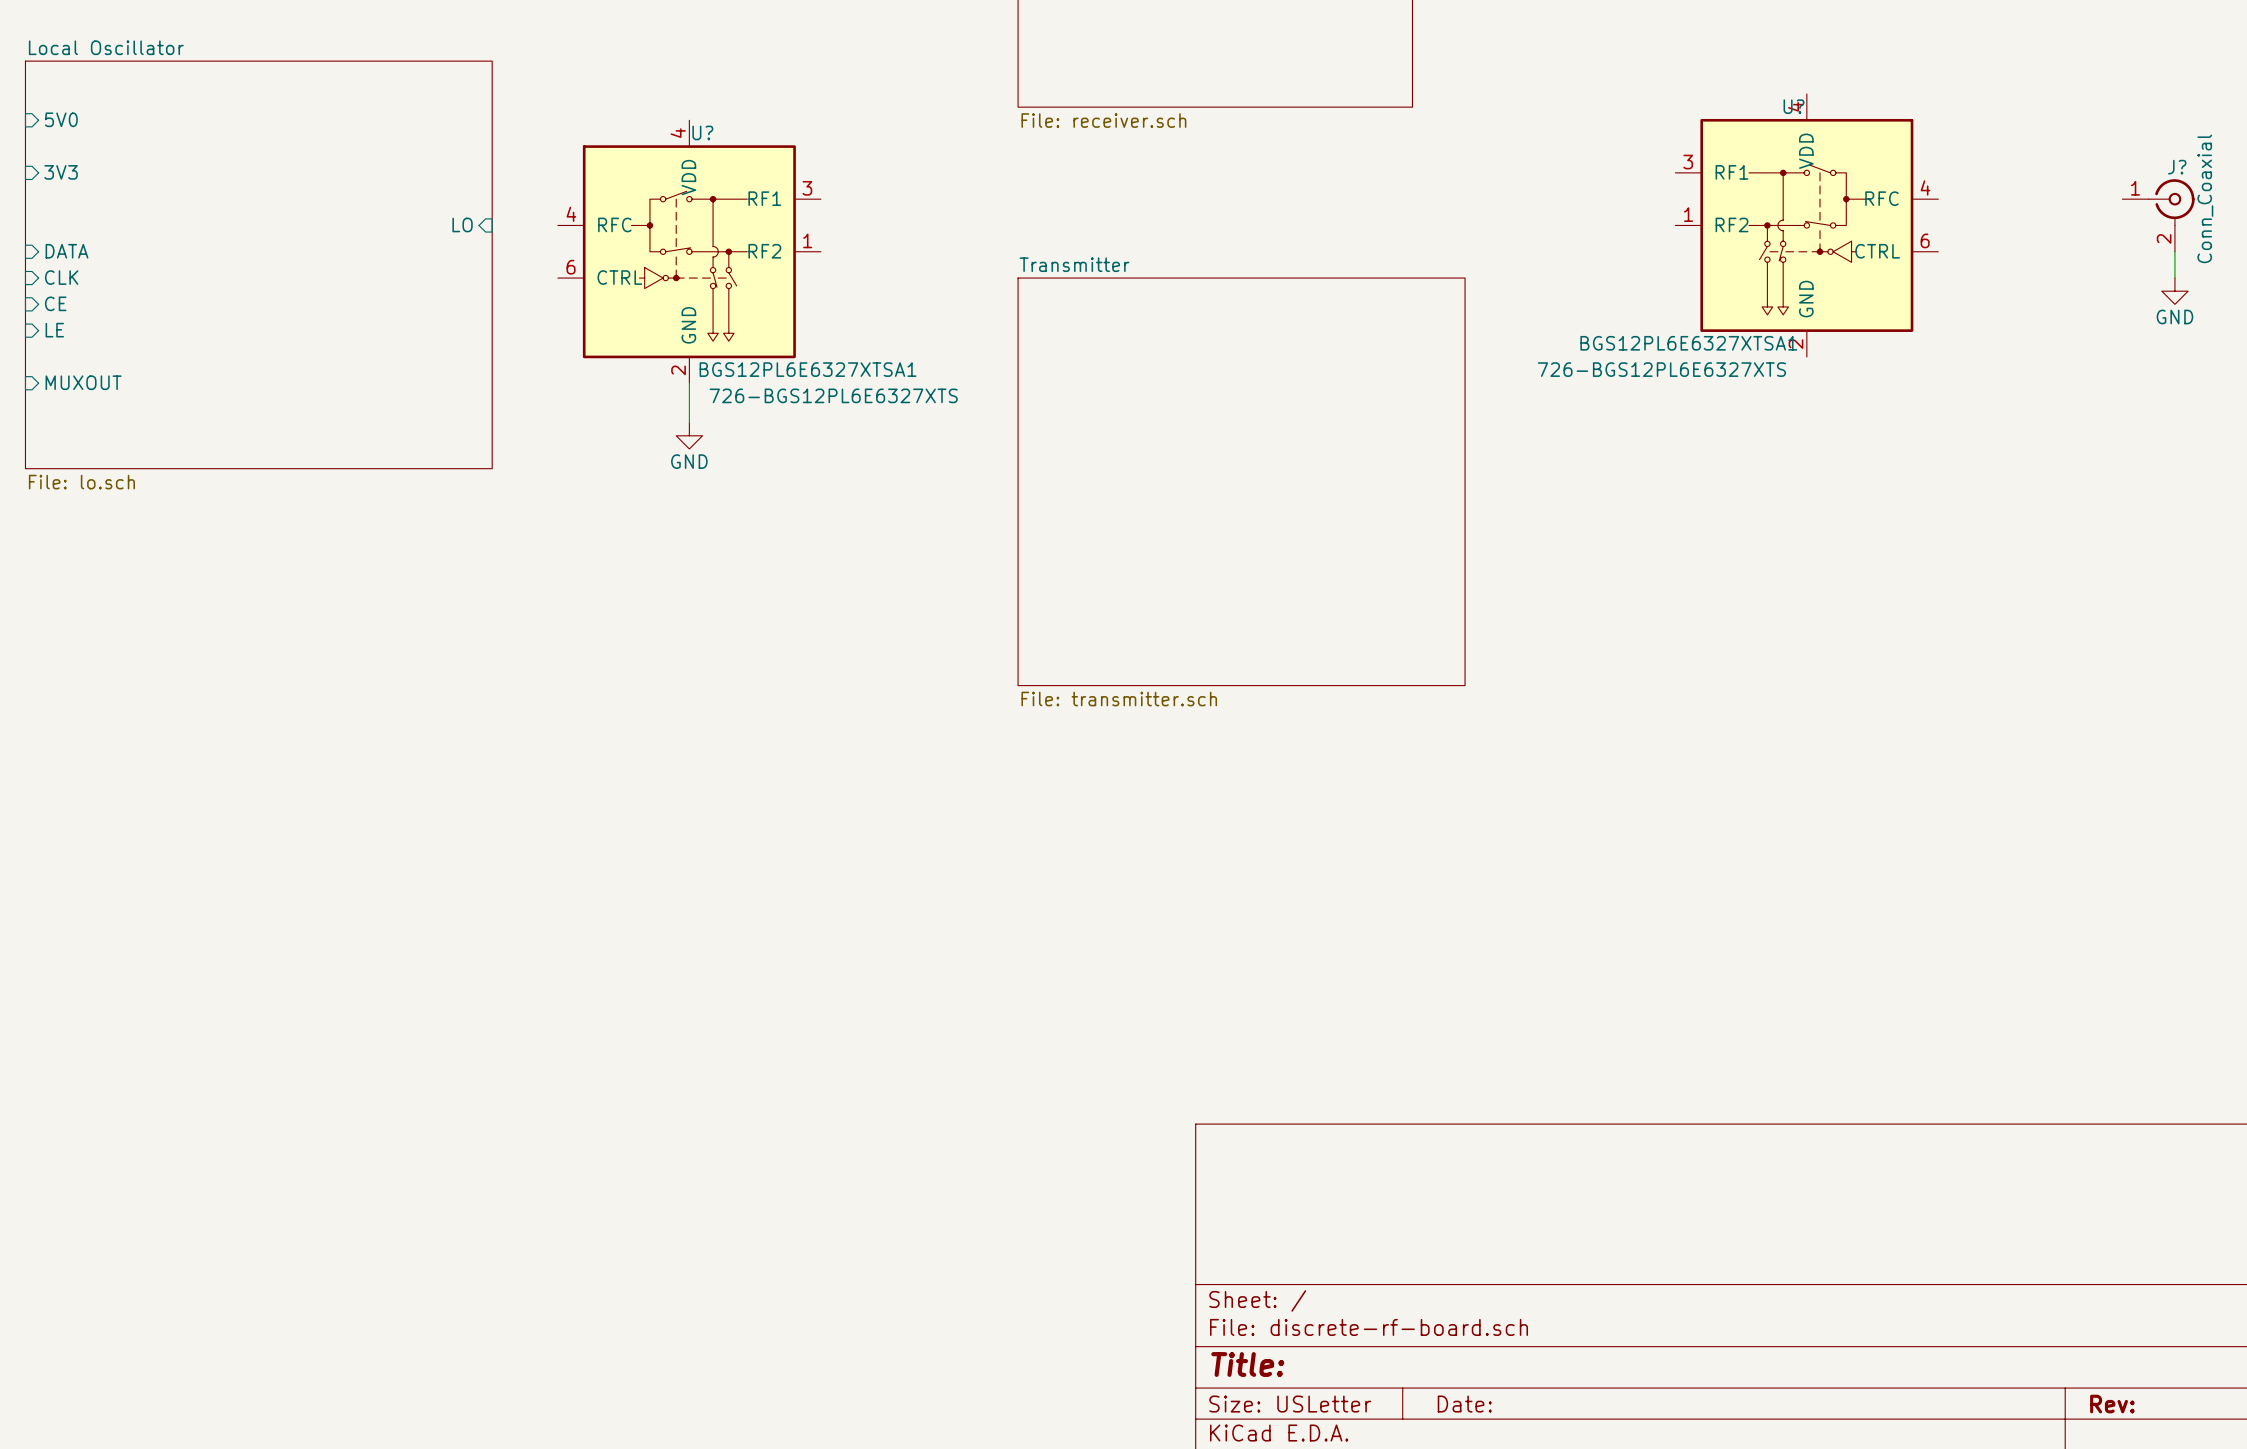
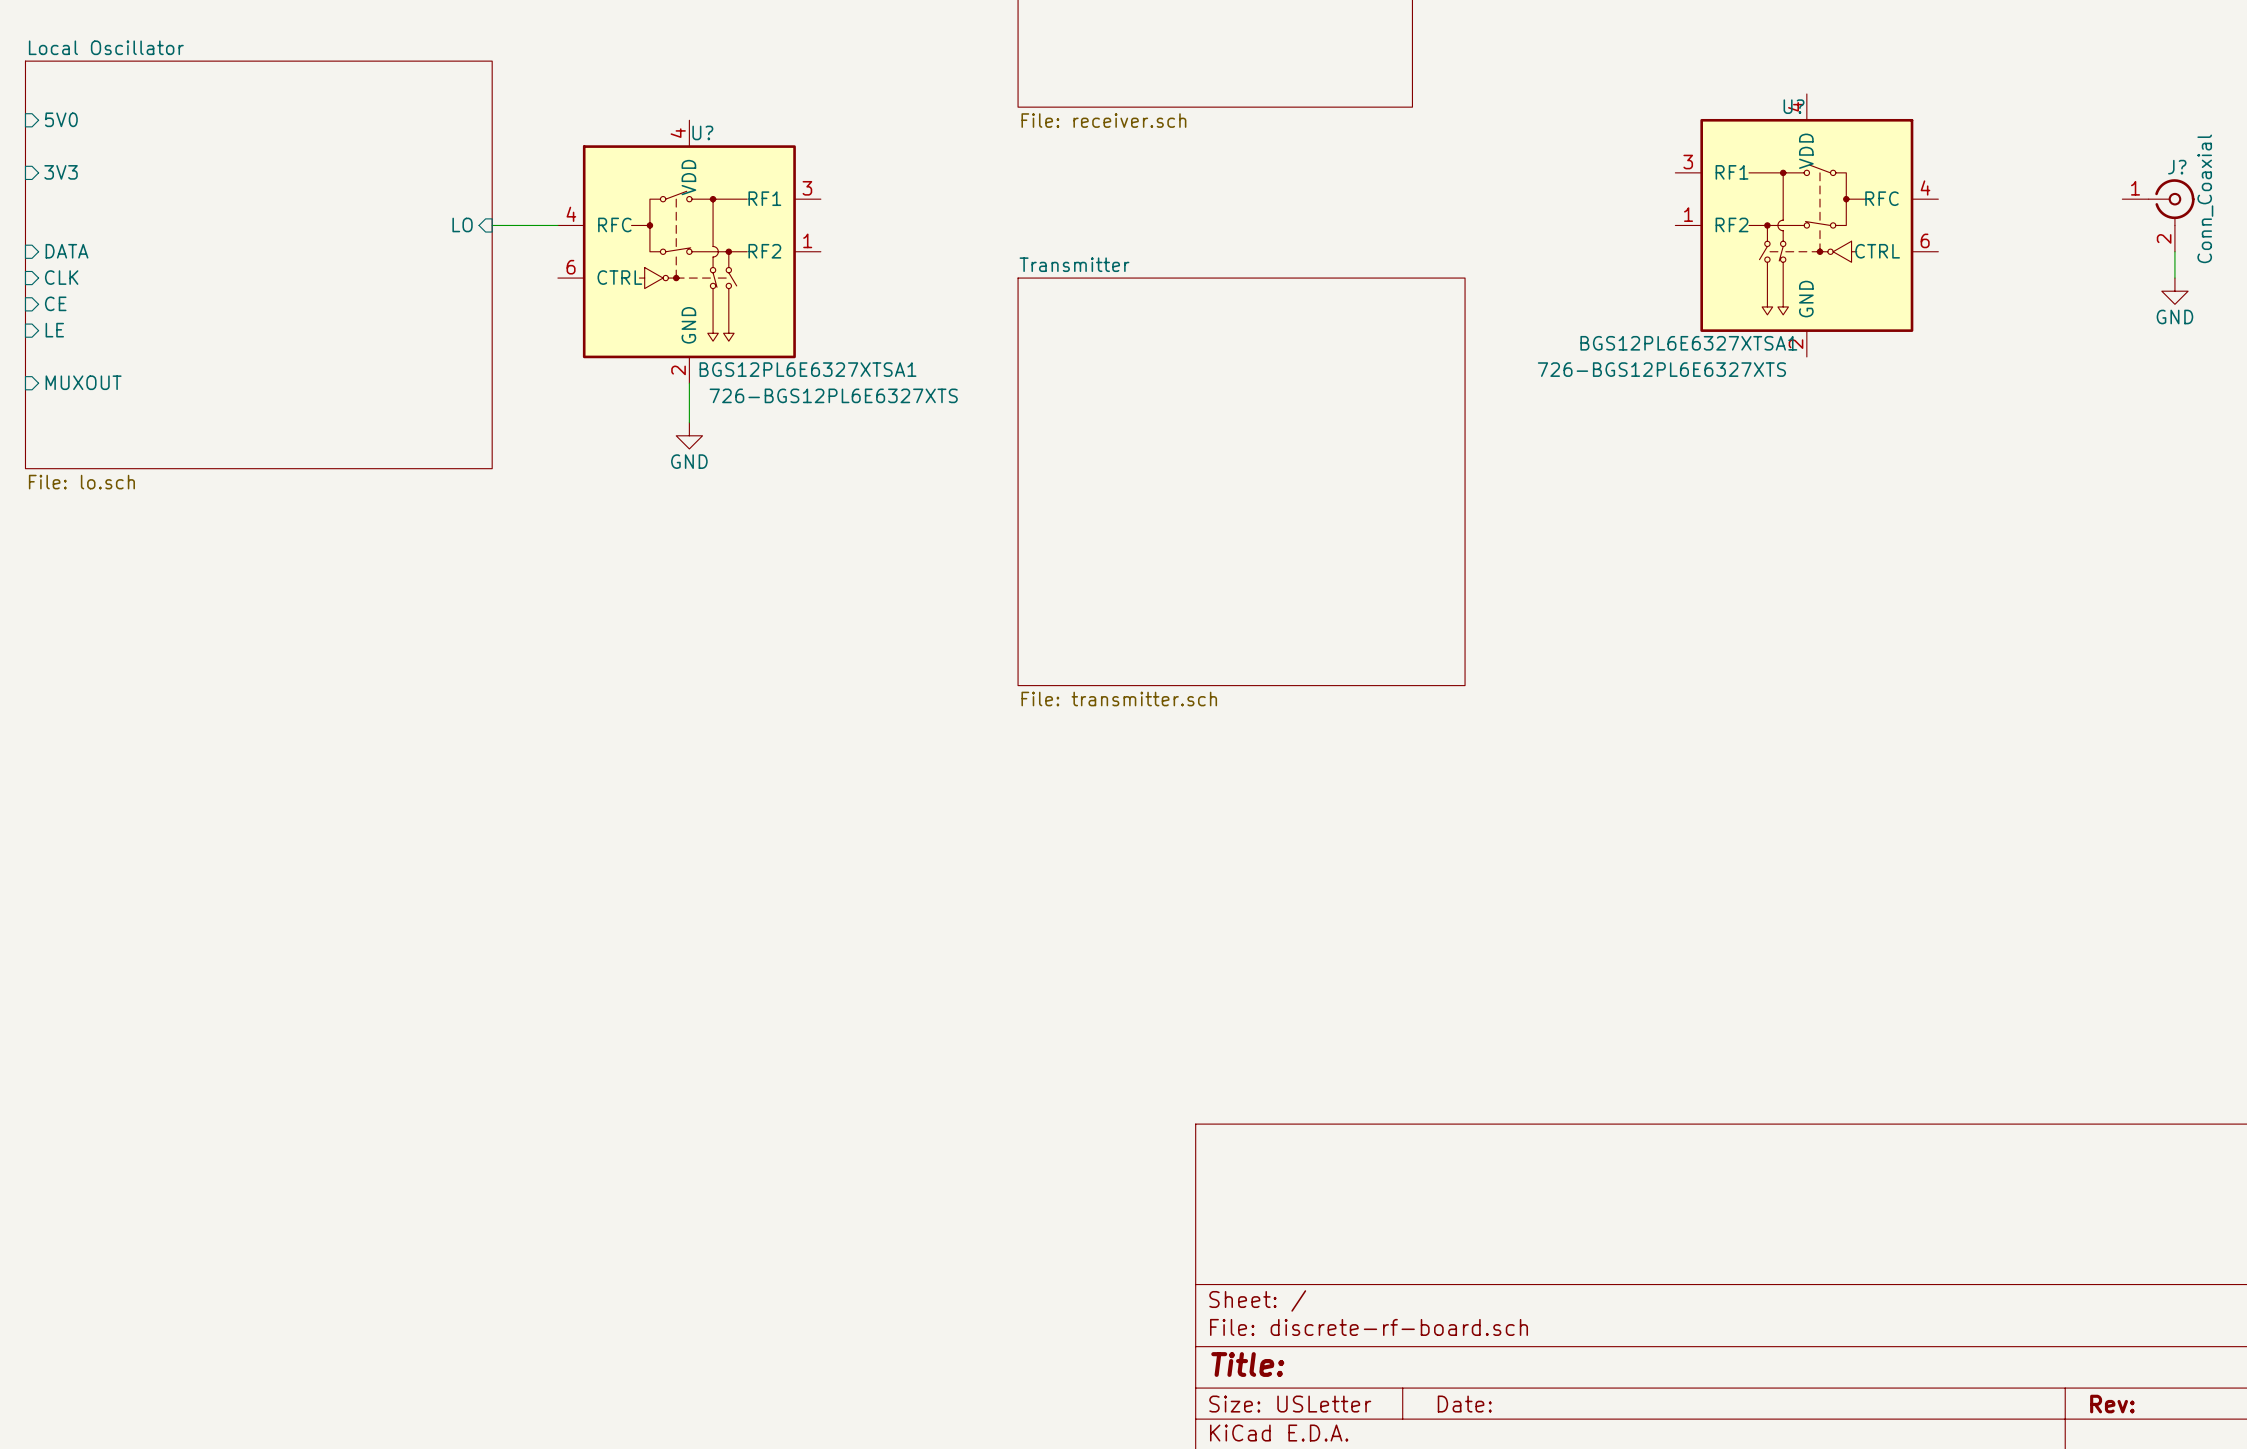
wire: none -> (492, 225) (557, 225)

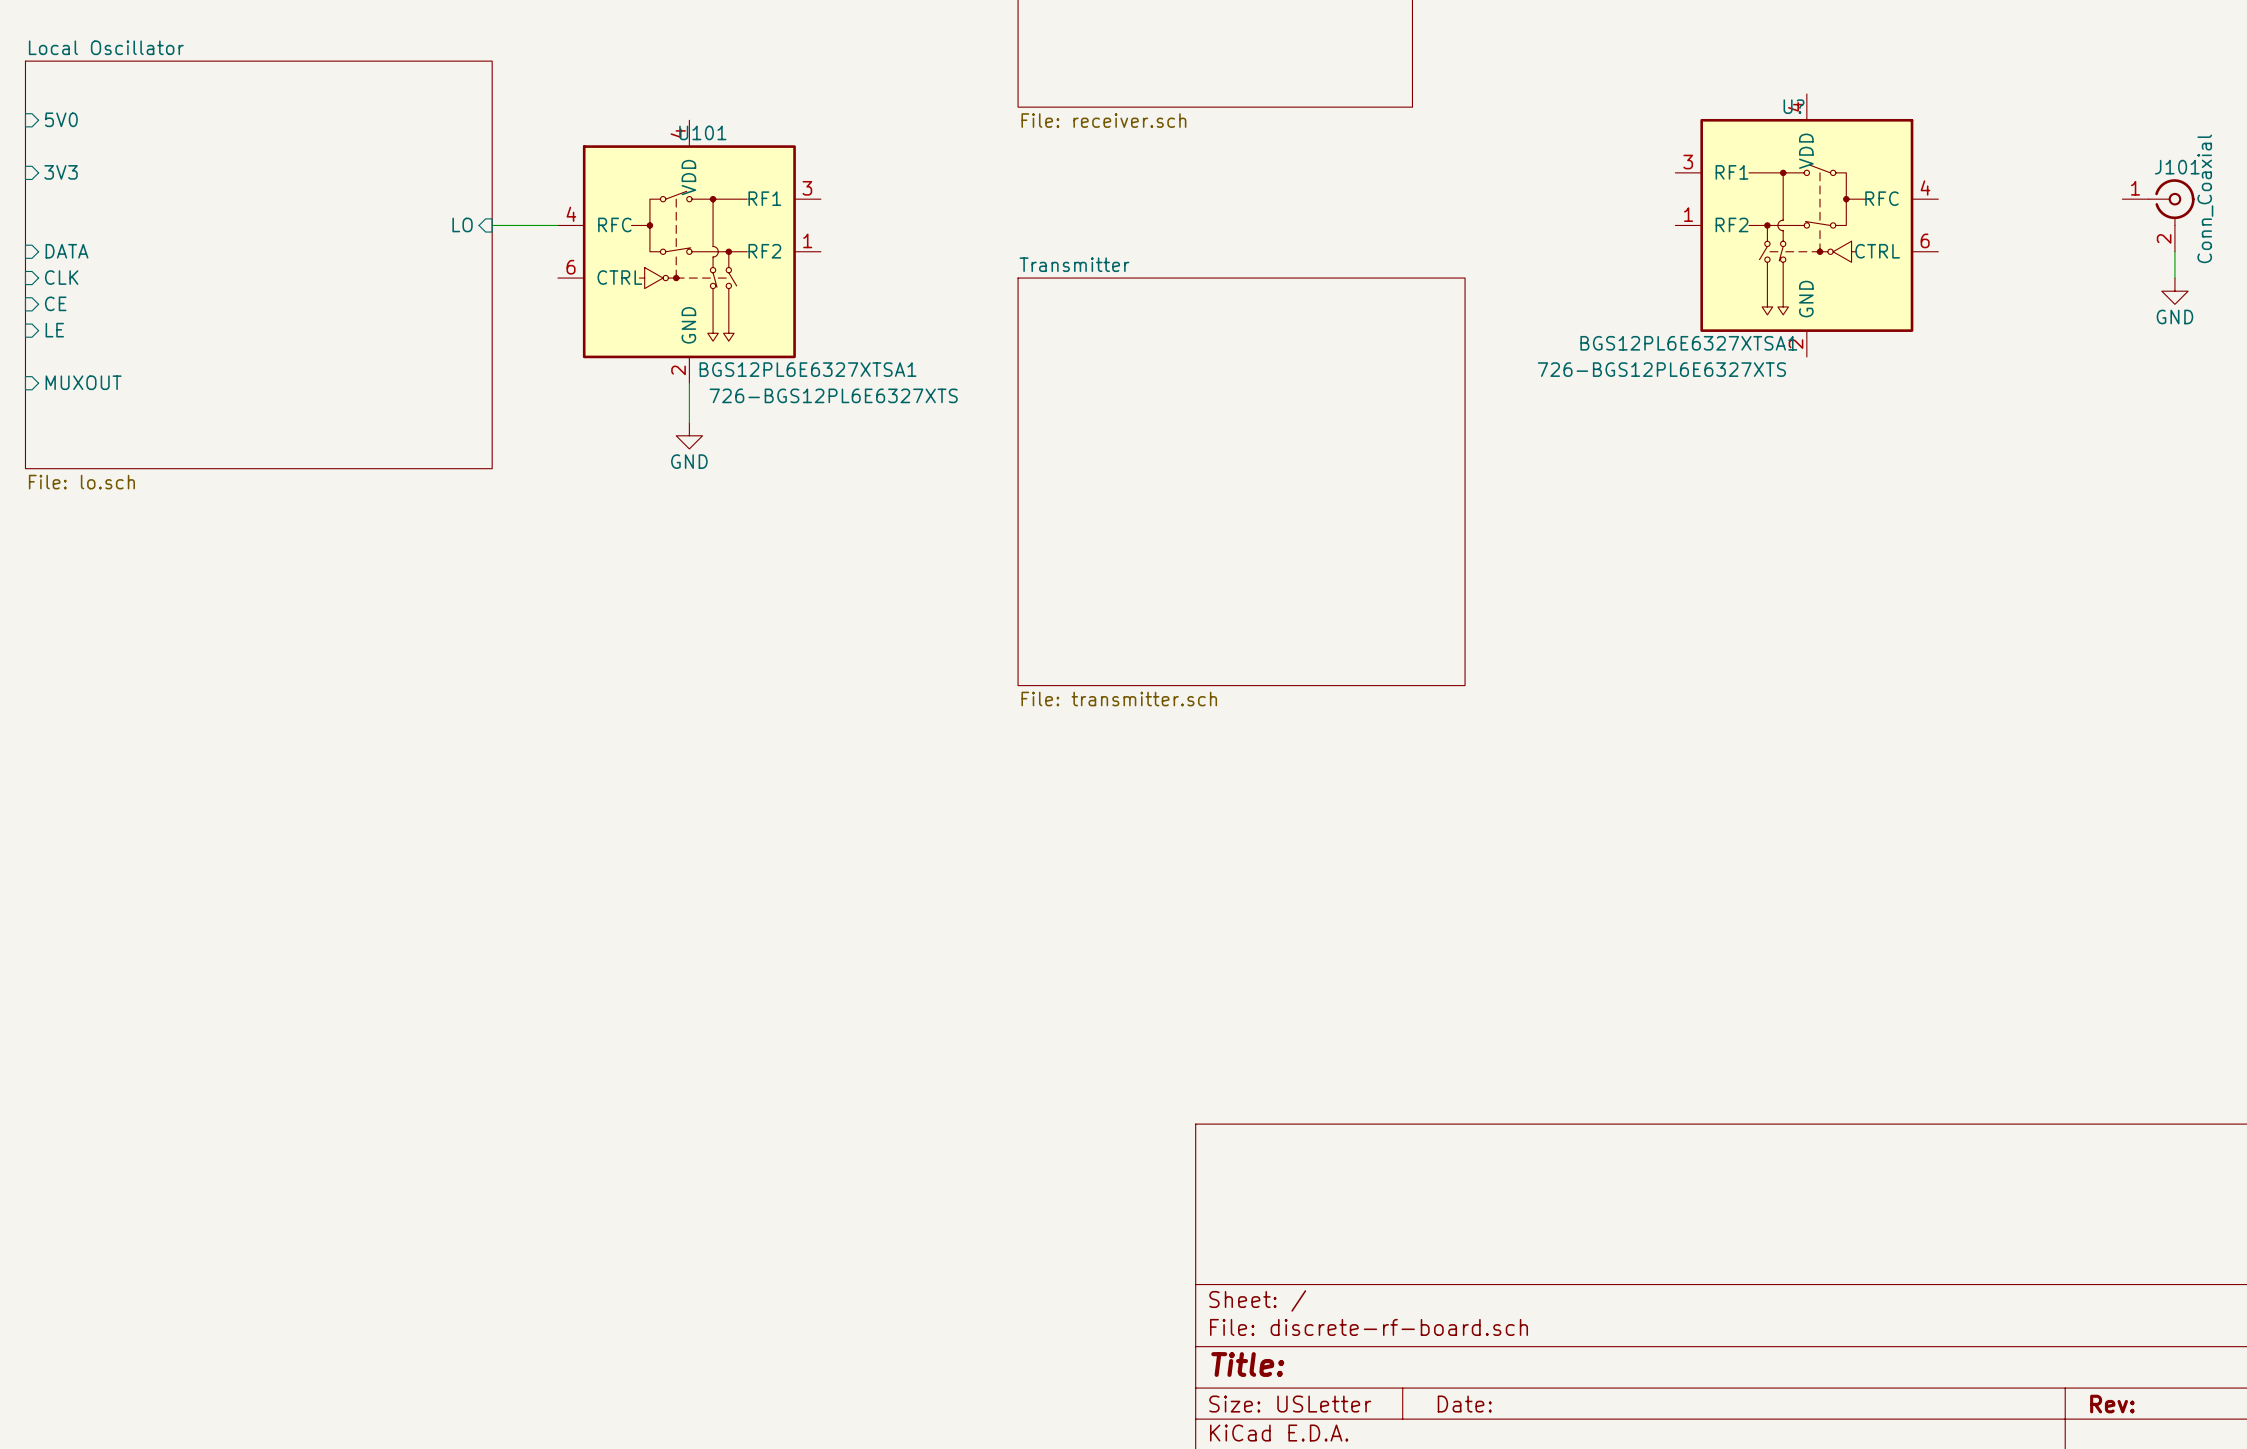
U? name: U? (702, 132) -> U101 (702, 132)
J? name: J? (2177, 167) -> J101 (2177, 167)

